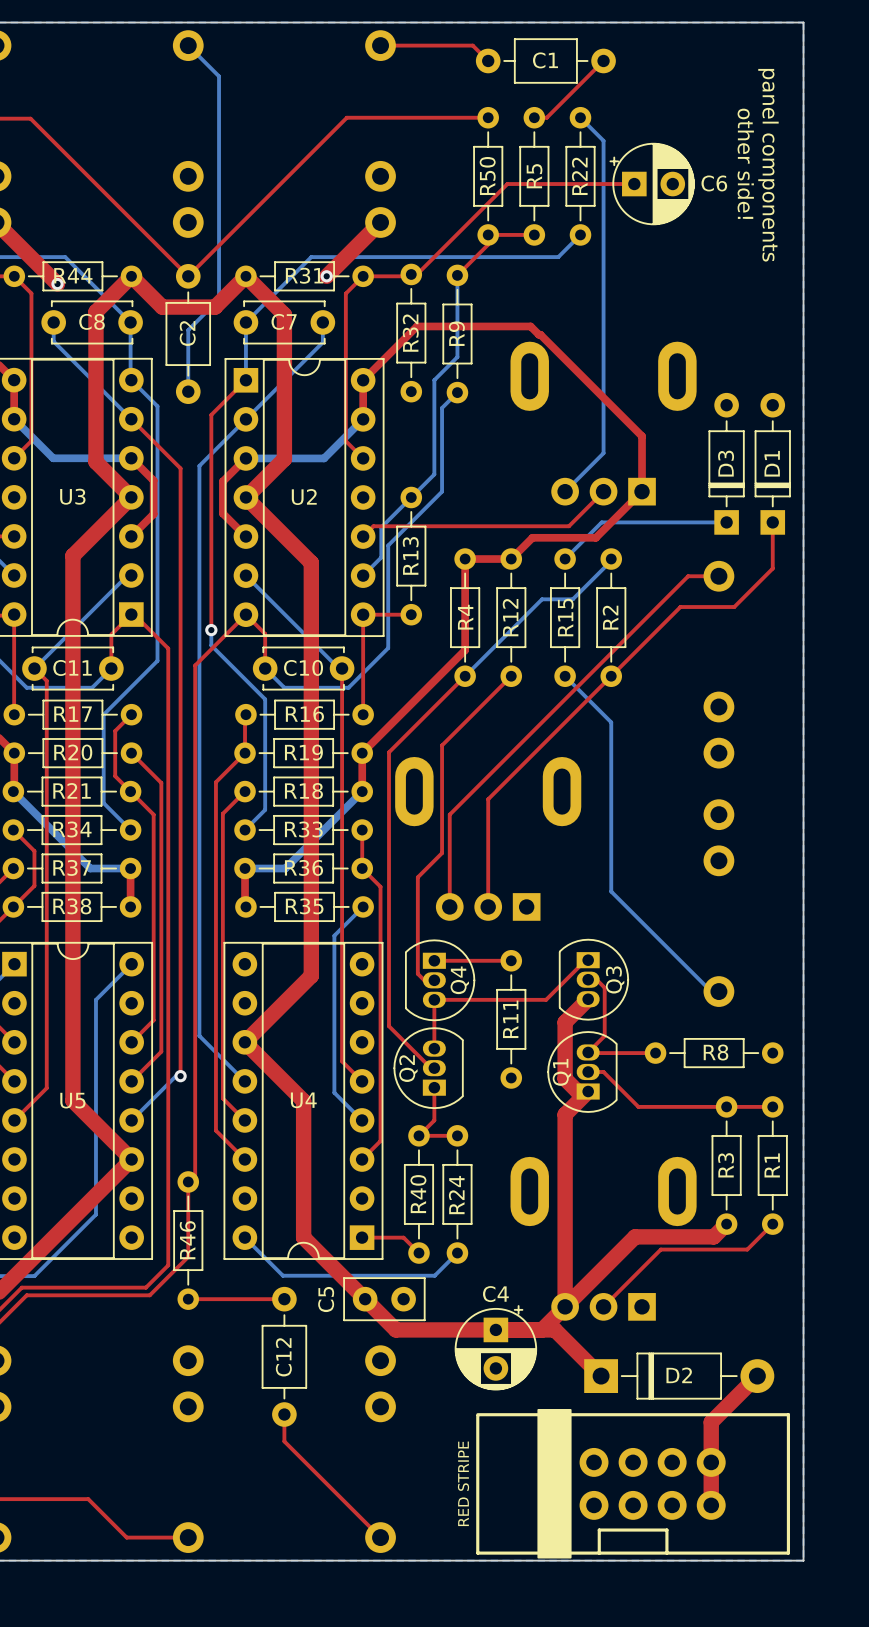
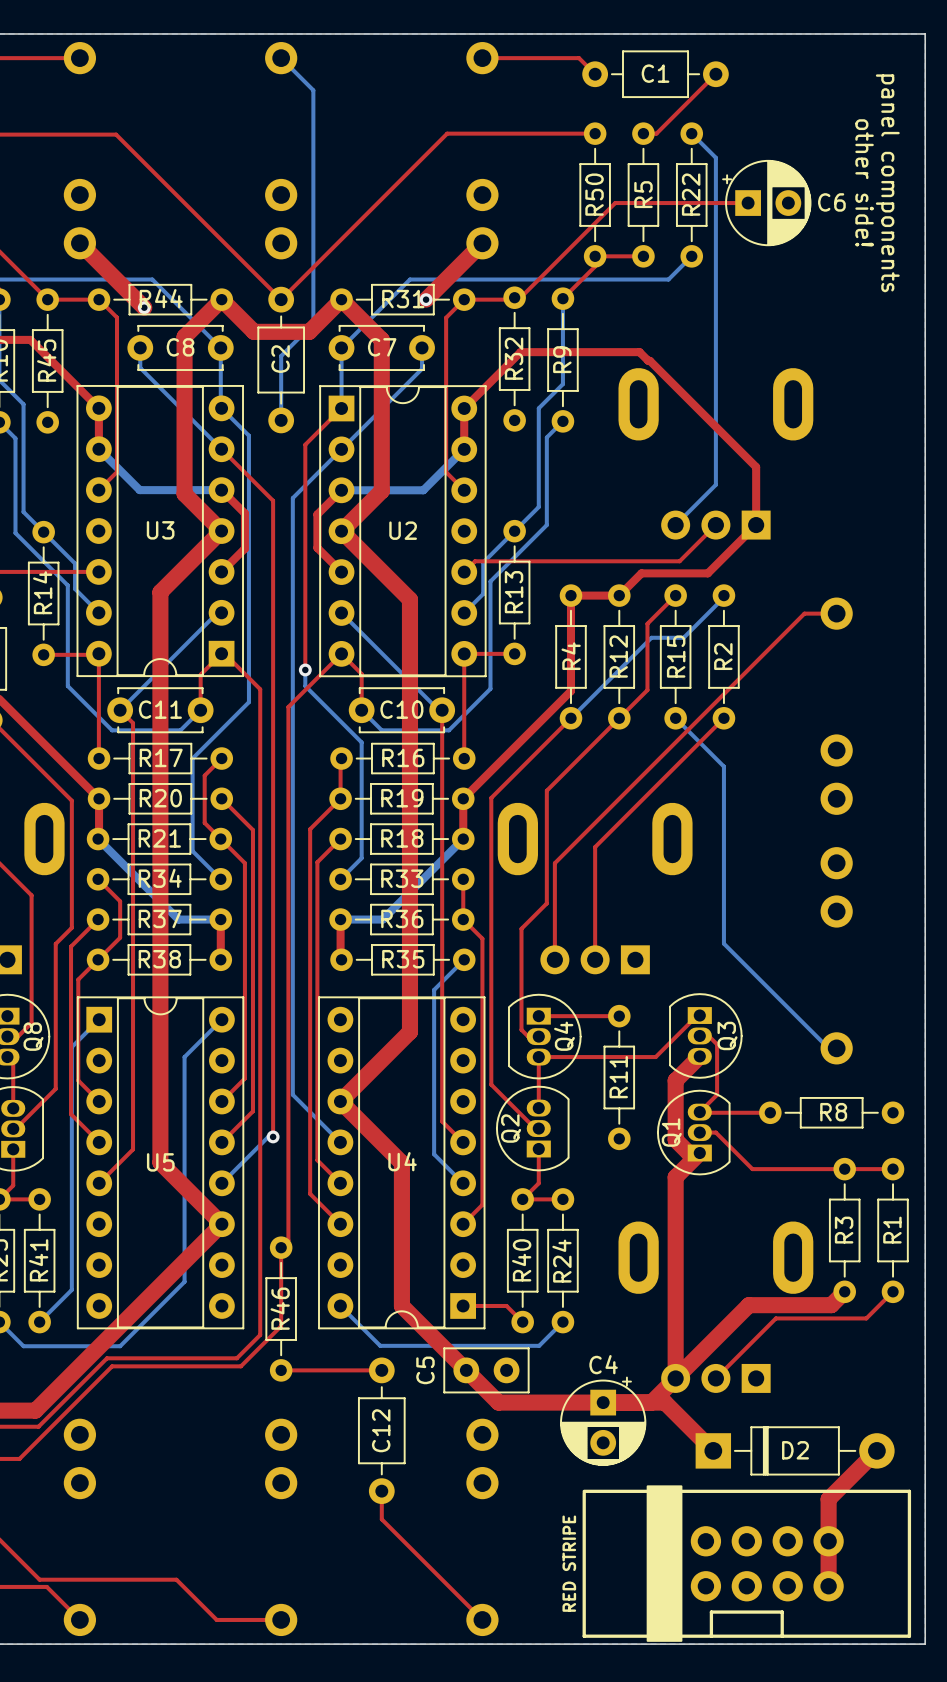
D3: (726, 463) -> none
D1: (772, 463) -> none
bottom track: (726, 522) (601, 522) (565, 559) -> none
top track: (772, 522) (772, 568) (734, 607) (680, 607) (611, 676) -> none
top track: none -> (675, 595) (647, 623) (647, 690) (619, 718)

